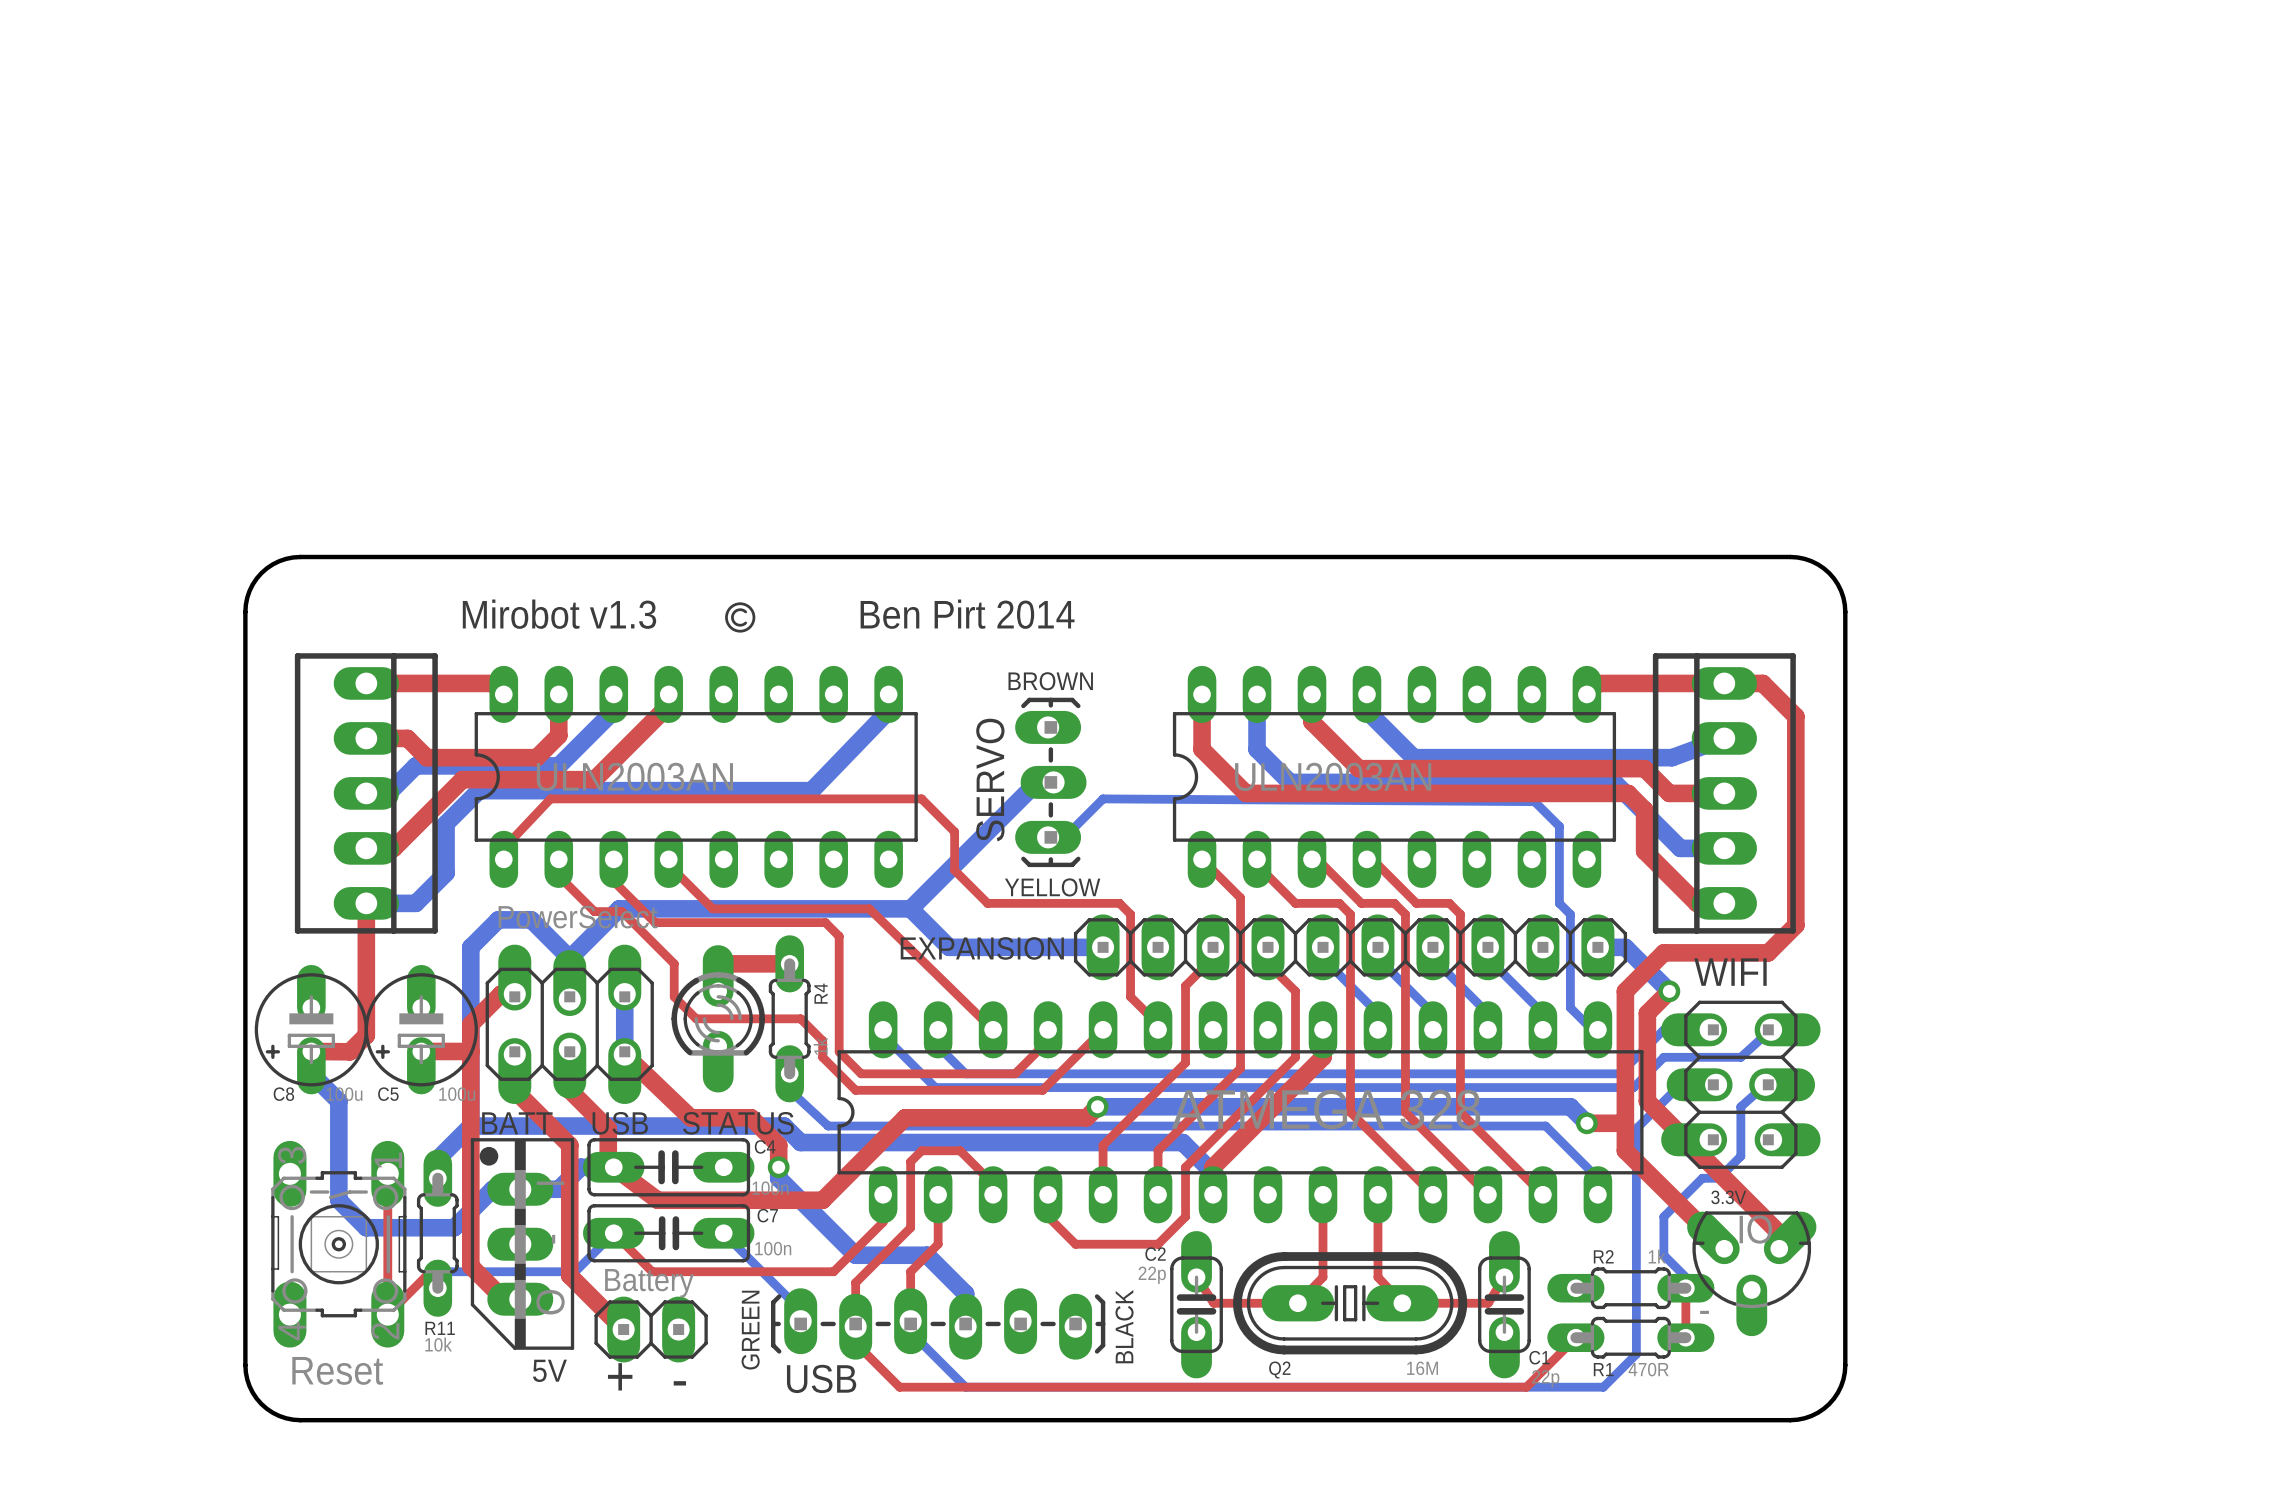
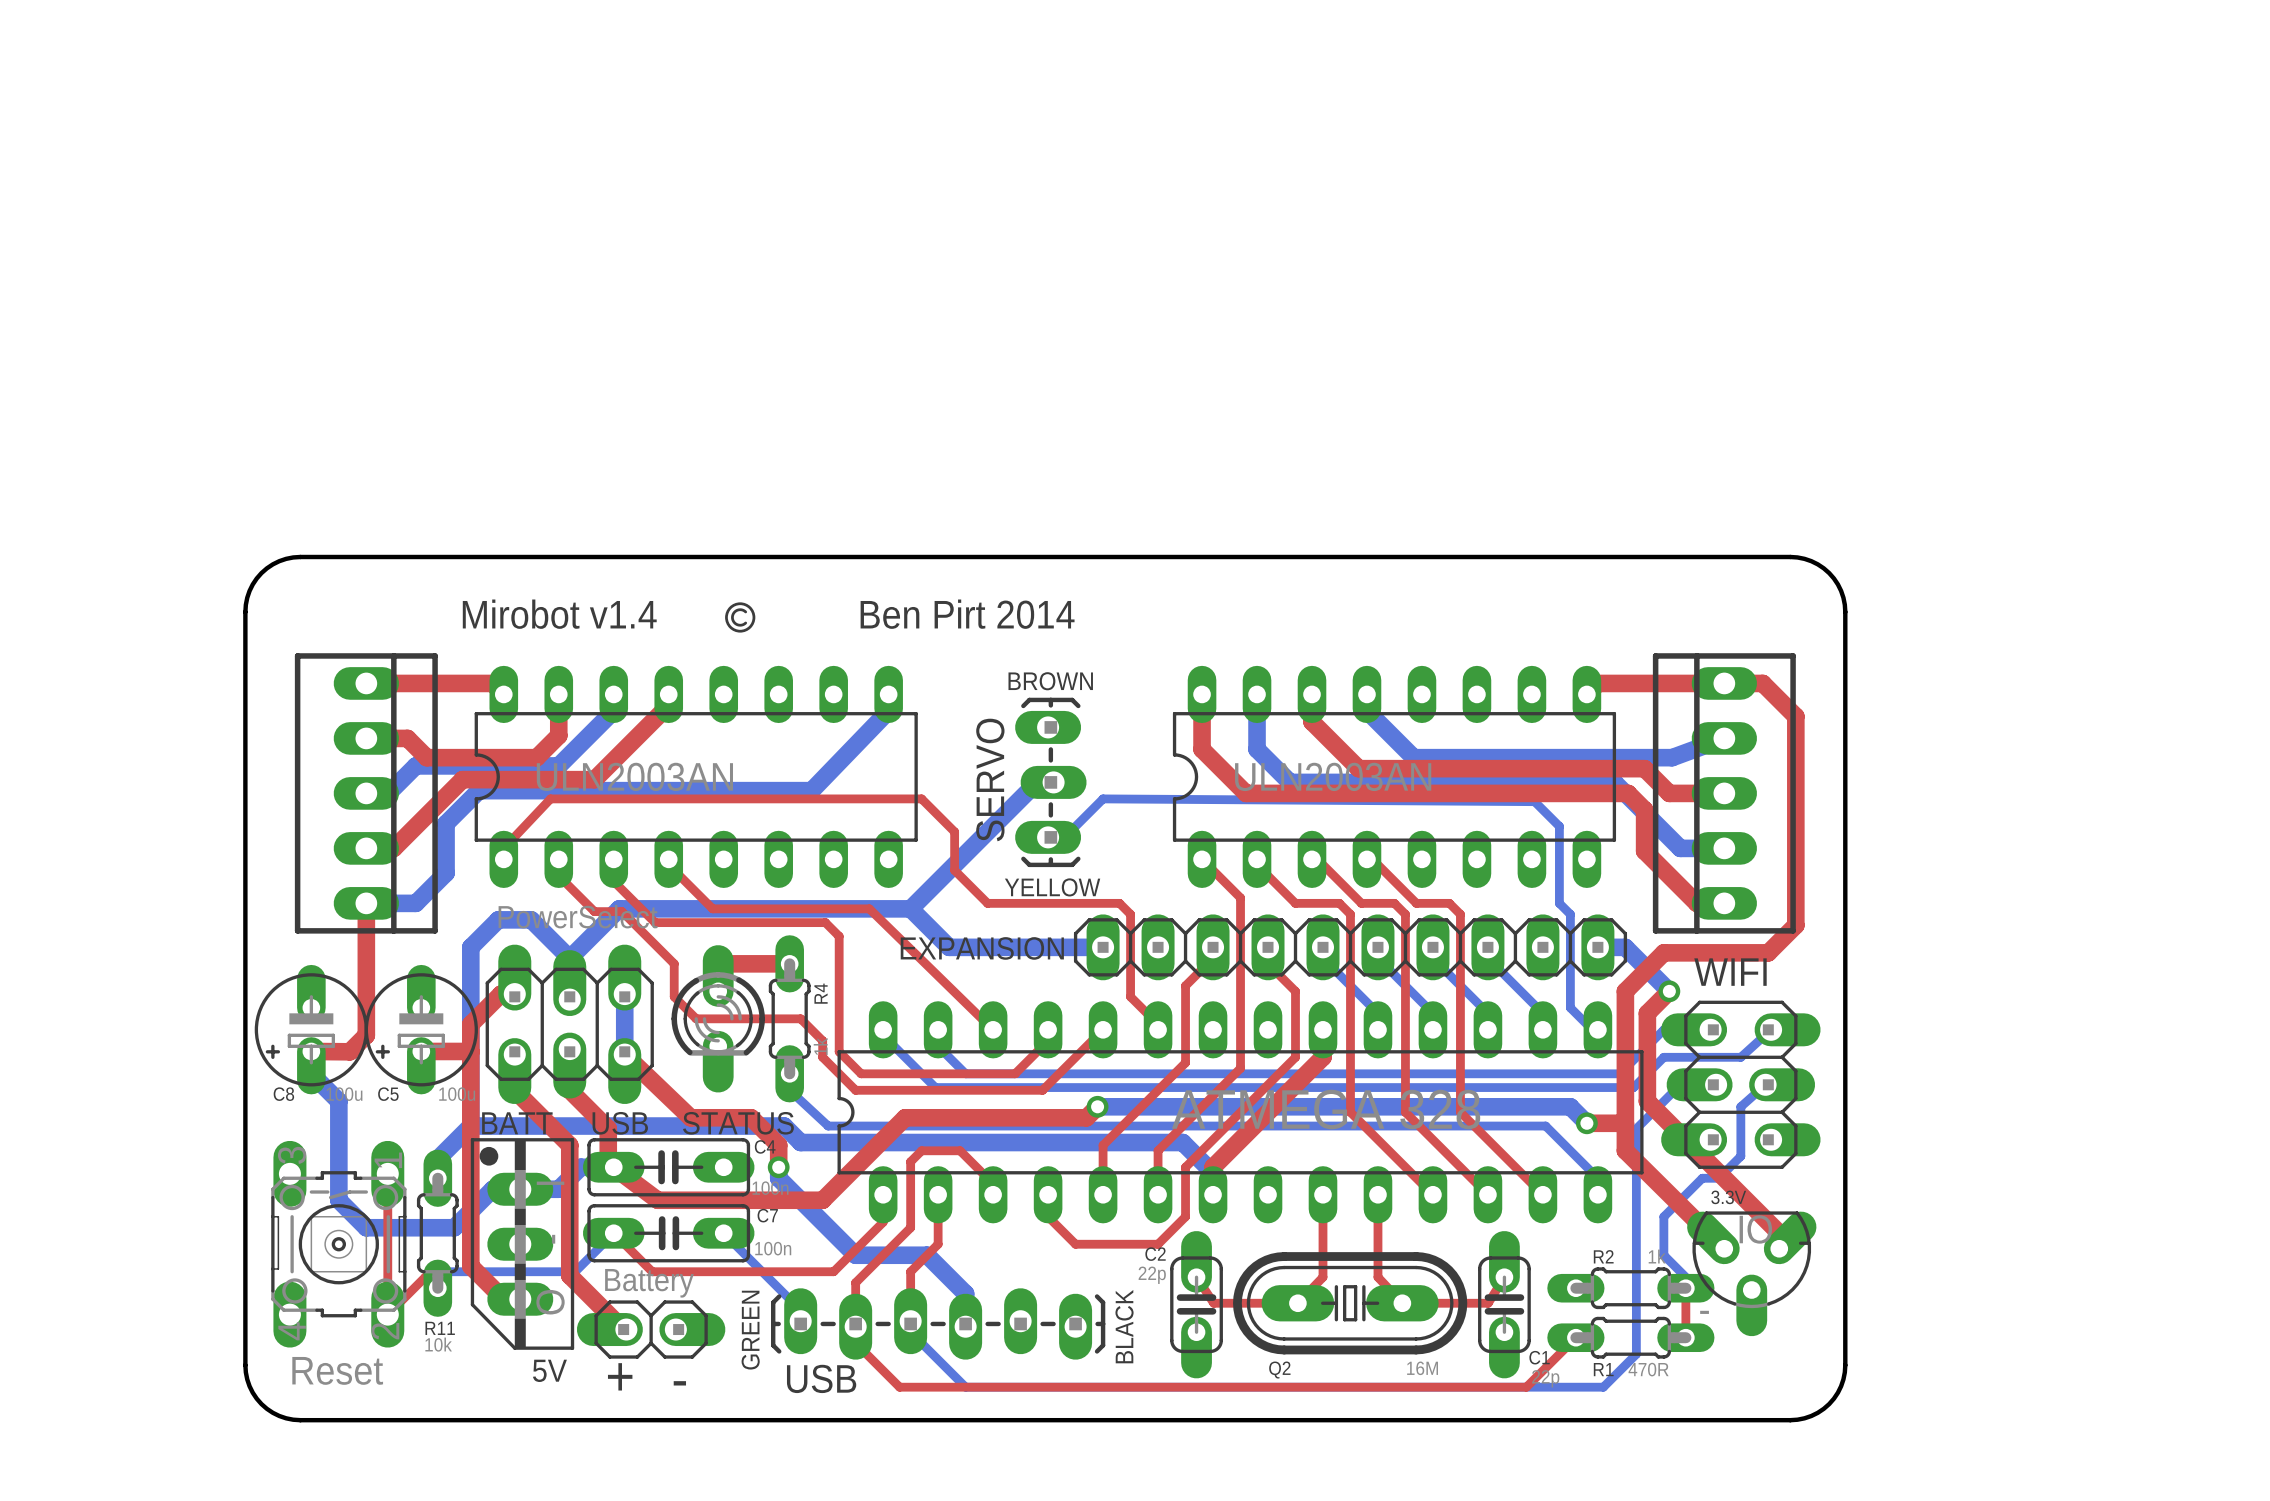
text: Mirobot v1.3 (559, 614) -> Mirobot v1.4 (559, 614)
part footprint: [594, 1296, 708, 1363] -> [576, 1300, 726, 1359]

